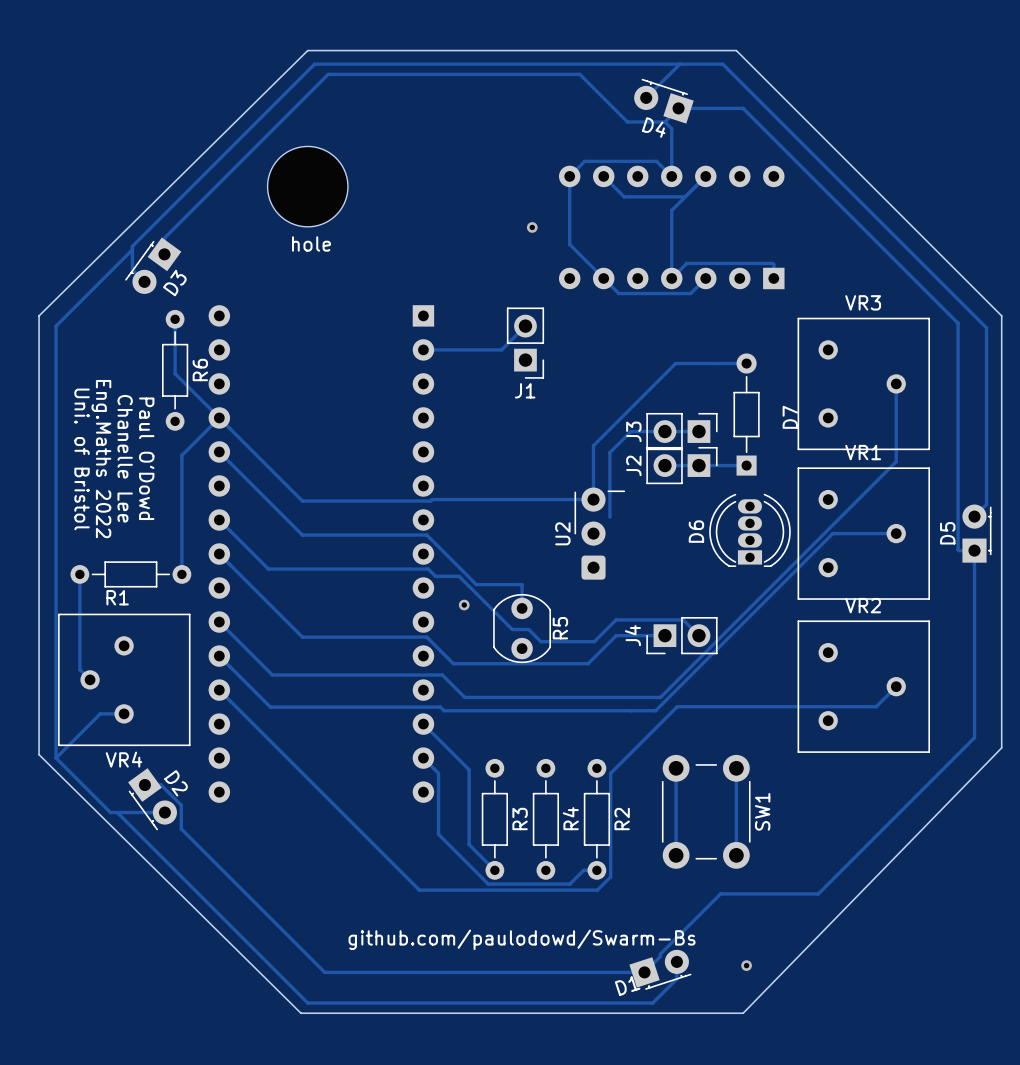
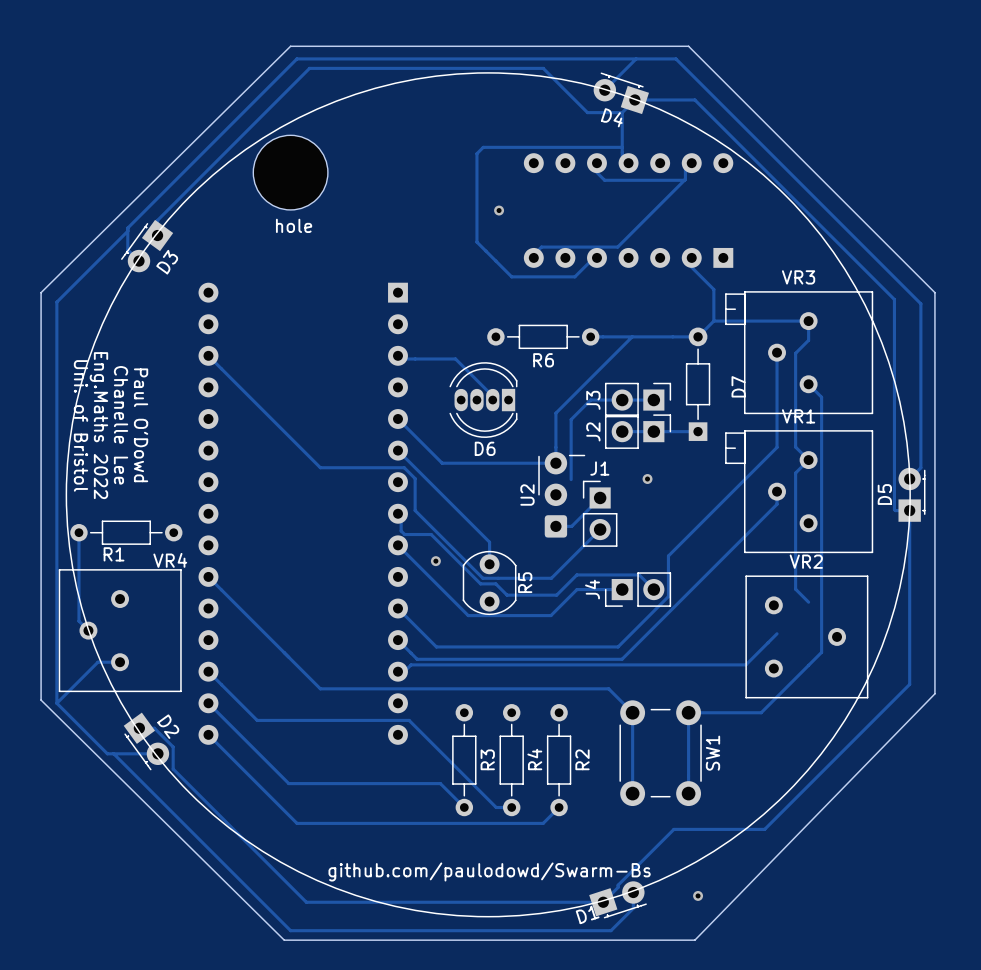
drawing: none -> [65, 72, 911, 918]
track: (664, 122) (671, 128) (671, 176) (656, 161) (584, 161) (569, 176) (569, 244) (618, 293) (690, 293) (705, 278) -> (622, 112) (622, 166)
track: none -> (622, 147) (483, 147) (476, 153) (476, 242) (511, 276) (574, 276) (590, 261)
track: (603, 176) (624, 196) (685, 196) -> none
track: (705, 176) (671, 210) (671, 278) (686, 263) (772, 263) (773, 278) -> none
track: none -> (590, 166) (604, 180) (684, 180)
track: none -> (685, 166) (685, 179) (617, 247) (541, 247) (527, 261)
track: none -> (685, 261) (713, 289) (713, 321)
VR3 footprint: [797, 317, 931, 451] -> [725, 291, 874, 415]
track: (175, 319) (175, 373) (302, 501) (471, 499) -> (401, 422) (442, 463)
track: (525, 326) (501, 349) (423, 349) -> none
J1 rotation: 0° (525, 343) -> 180° (600, 513)
J1 position: (525, 343) -> (600, 513)
track: none -> (713, 321) (698, 336)
track: none -> (713, 321) (808, 321) (808, 340) (795, 353) (795, 447) (808, 460) (795, 473) (795, 589) (808, 602)
track: none -> (590, 336) (632, 336)
R6 rotation: 0° (175, 370) -> 90° clockwise (543, 336)
R6 position: (175, 370) -> (543, 336)
track: (896, 383) (896, 461) (714, 643) -> (777, 352) (777, 447) (668, 556) (668, 596)
track: none -> (211, 358) (320, 467) (404, 467) (415, 478) (415, 510) (482, 578) (551, 578) (600, 529)
track: none -> (401, 358) (455, 358) (492, 396) (492, 400)
track: (219, 417) (181, 455) (181, 574) -> none
track: (219, 451) (302, 535) (426, 535) (476, 584) (522, 584) -> (401, 453) (489, 542)
VR1 footprint: [797, 467, 931, 600] -> [725, 430, 874, 554]
via: none -> (647, 479)
track: (219, 519) (268, 569) (428, 569) (435, 576) -> (401, 516) (401, 530) (404, 534) (409, 534)
D6 rotation: 0° (749, 530) -> 90° counterclockwise (483, 400)
D6 position: (749, 530) -> (483, 400)
track: (896, 533) (832, 533) (655, 710) -> (777, 491) (777, 504) (622, 659) (613, 659)
track: none -> (600, 497) (571, 526) (555, 526)
track: (219, 554) (302, 637) (426, 637) (453, 663) (499, 663) -> (401, 548) (468, 615)
track: (219, 656) (270, 707) (440, 707) -> (401, 643) (413, 655)
track: (272, 675) (442, 675) -> (401, 611) (415, 626)
track: none -> (257, 626) (320, 688) (608, 688) (632, 712)
track: none -> (777, 633) (745, 664) (411, 664) (401, 674)
track: (896, 686) (879, 703) -> (808, 384) (821, 397) (821, 652)
track: (219, 690) (419, 890) (597, 890) (610, 876) (610, 773) (677, 706) (876, 706) -> (688, 712) (761, 712) (818, 655)
track: (423, 724) (469, 769) (469, 844) -> (211, 706) (288, 783) (440, 783)
track: none -> (211, 674) (257, 720) (409, 720) (496, 807) (511, 807)
track: (423, 758) (438, 773) (438, 834) (488, 884) (569, 884) (583, 870) (596, 870) -> (211, 738) (297, 823) (543, 823) (559, 807)
VR4 name position: VR4 (123, 759) -> VR4 (170, 560)

